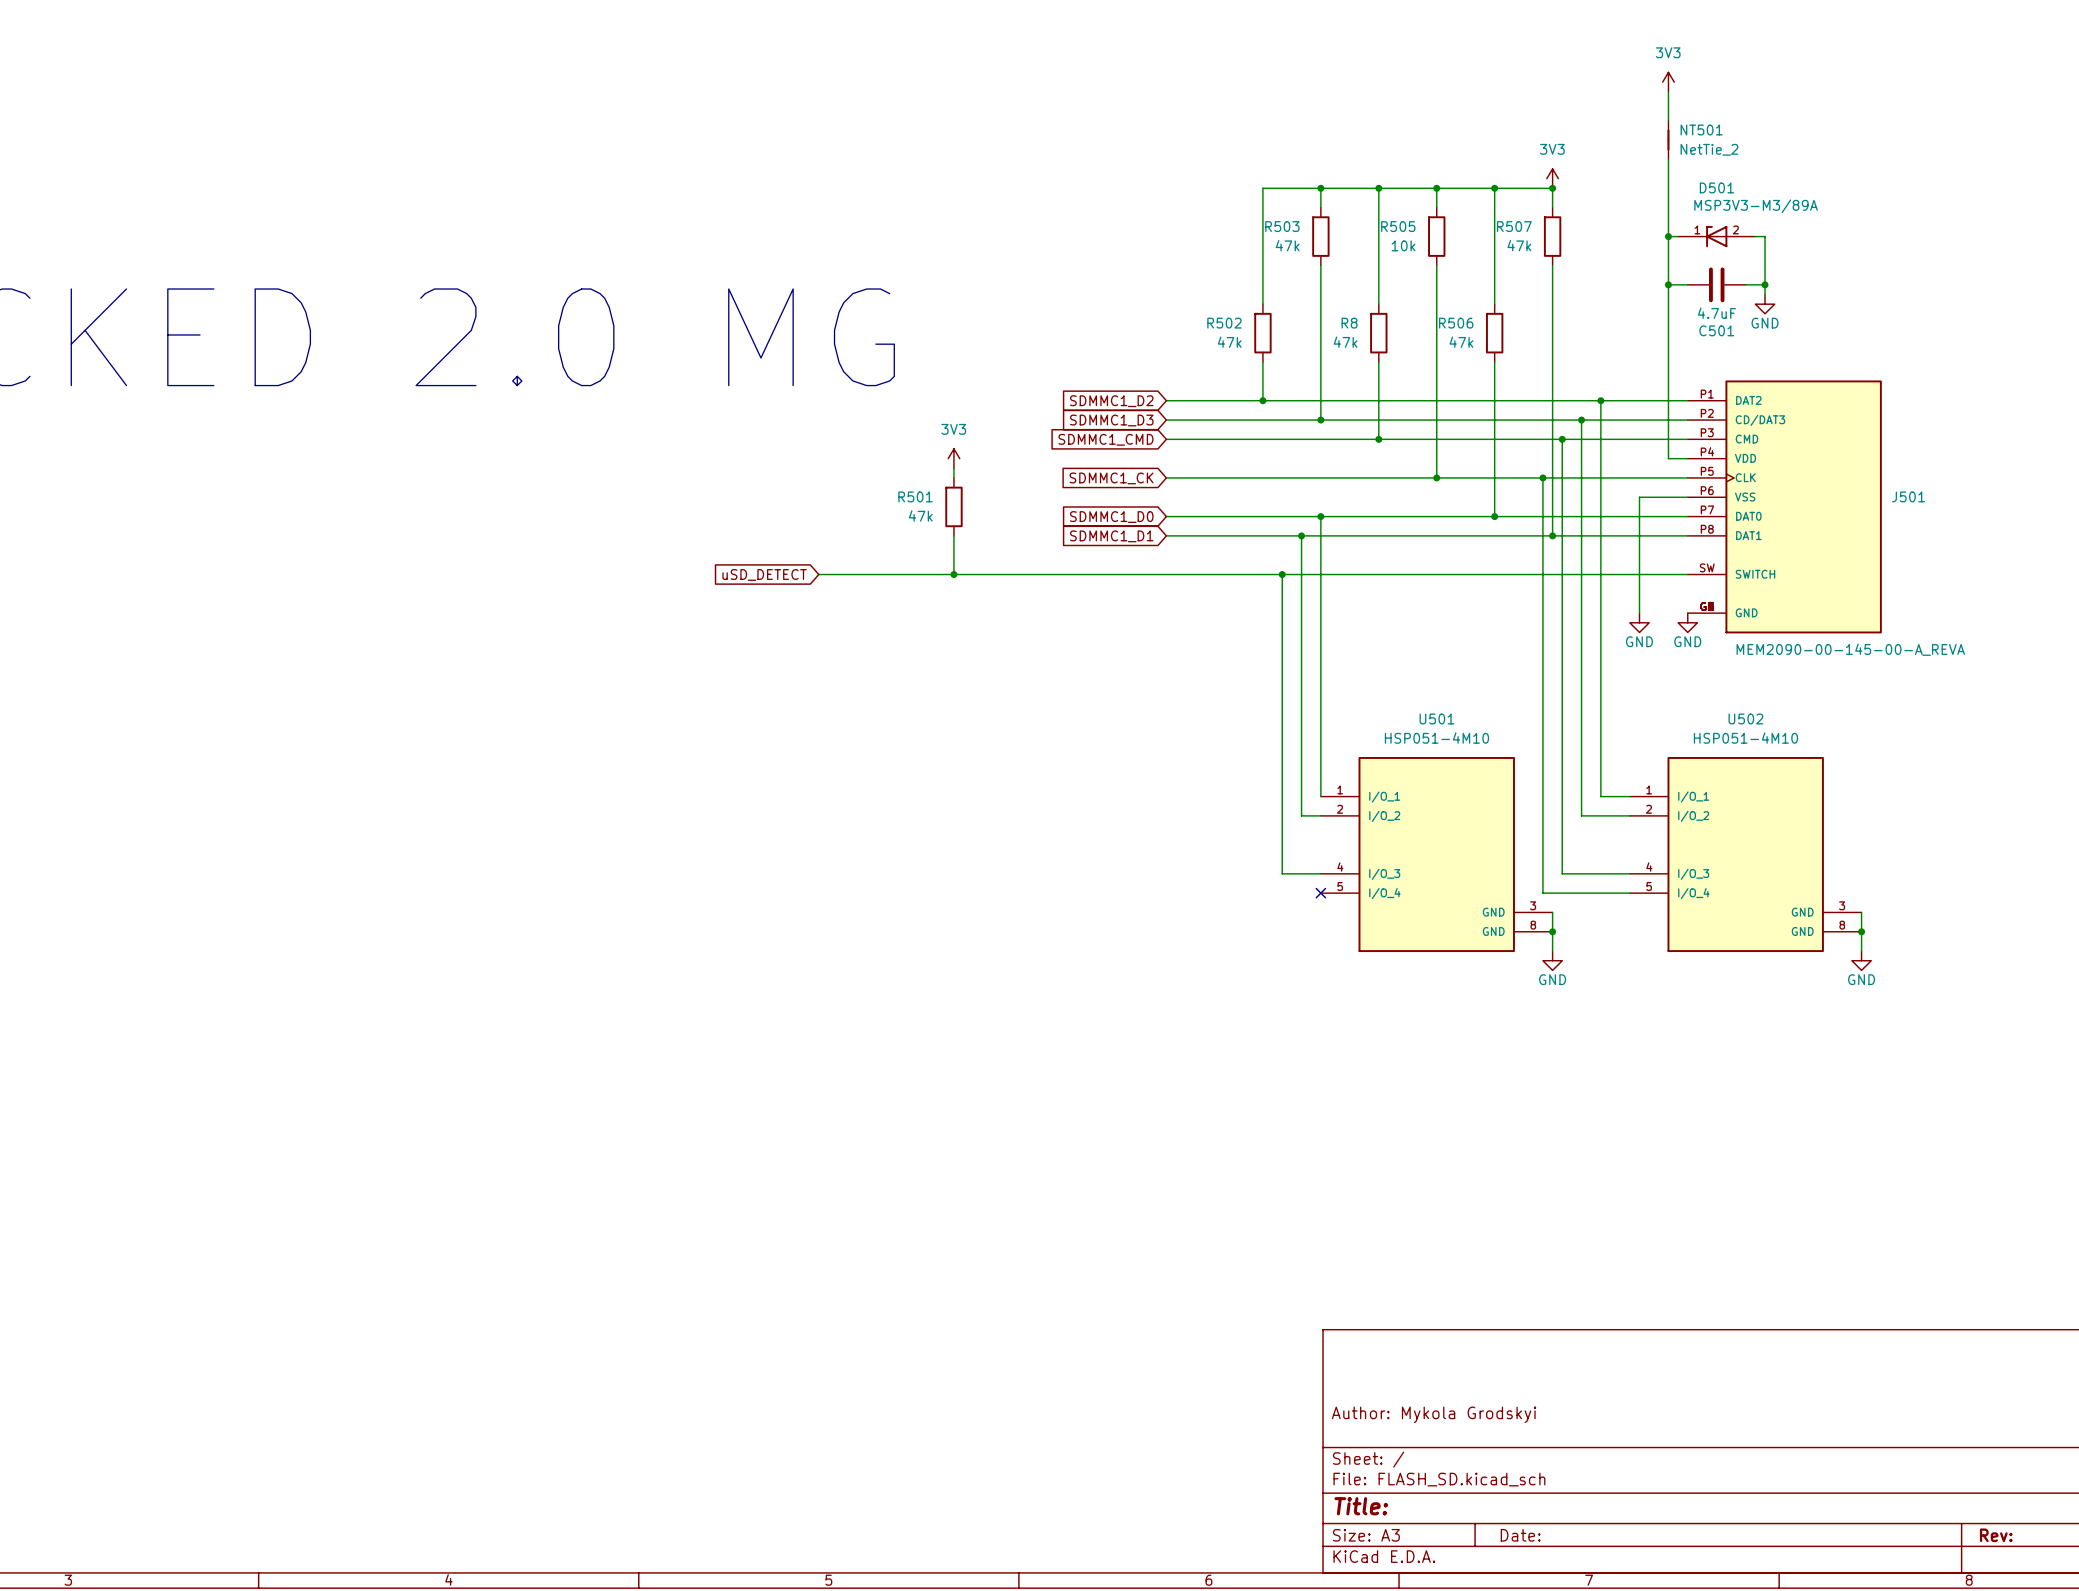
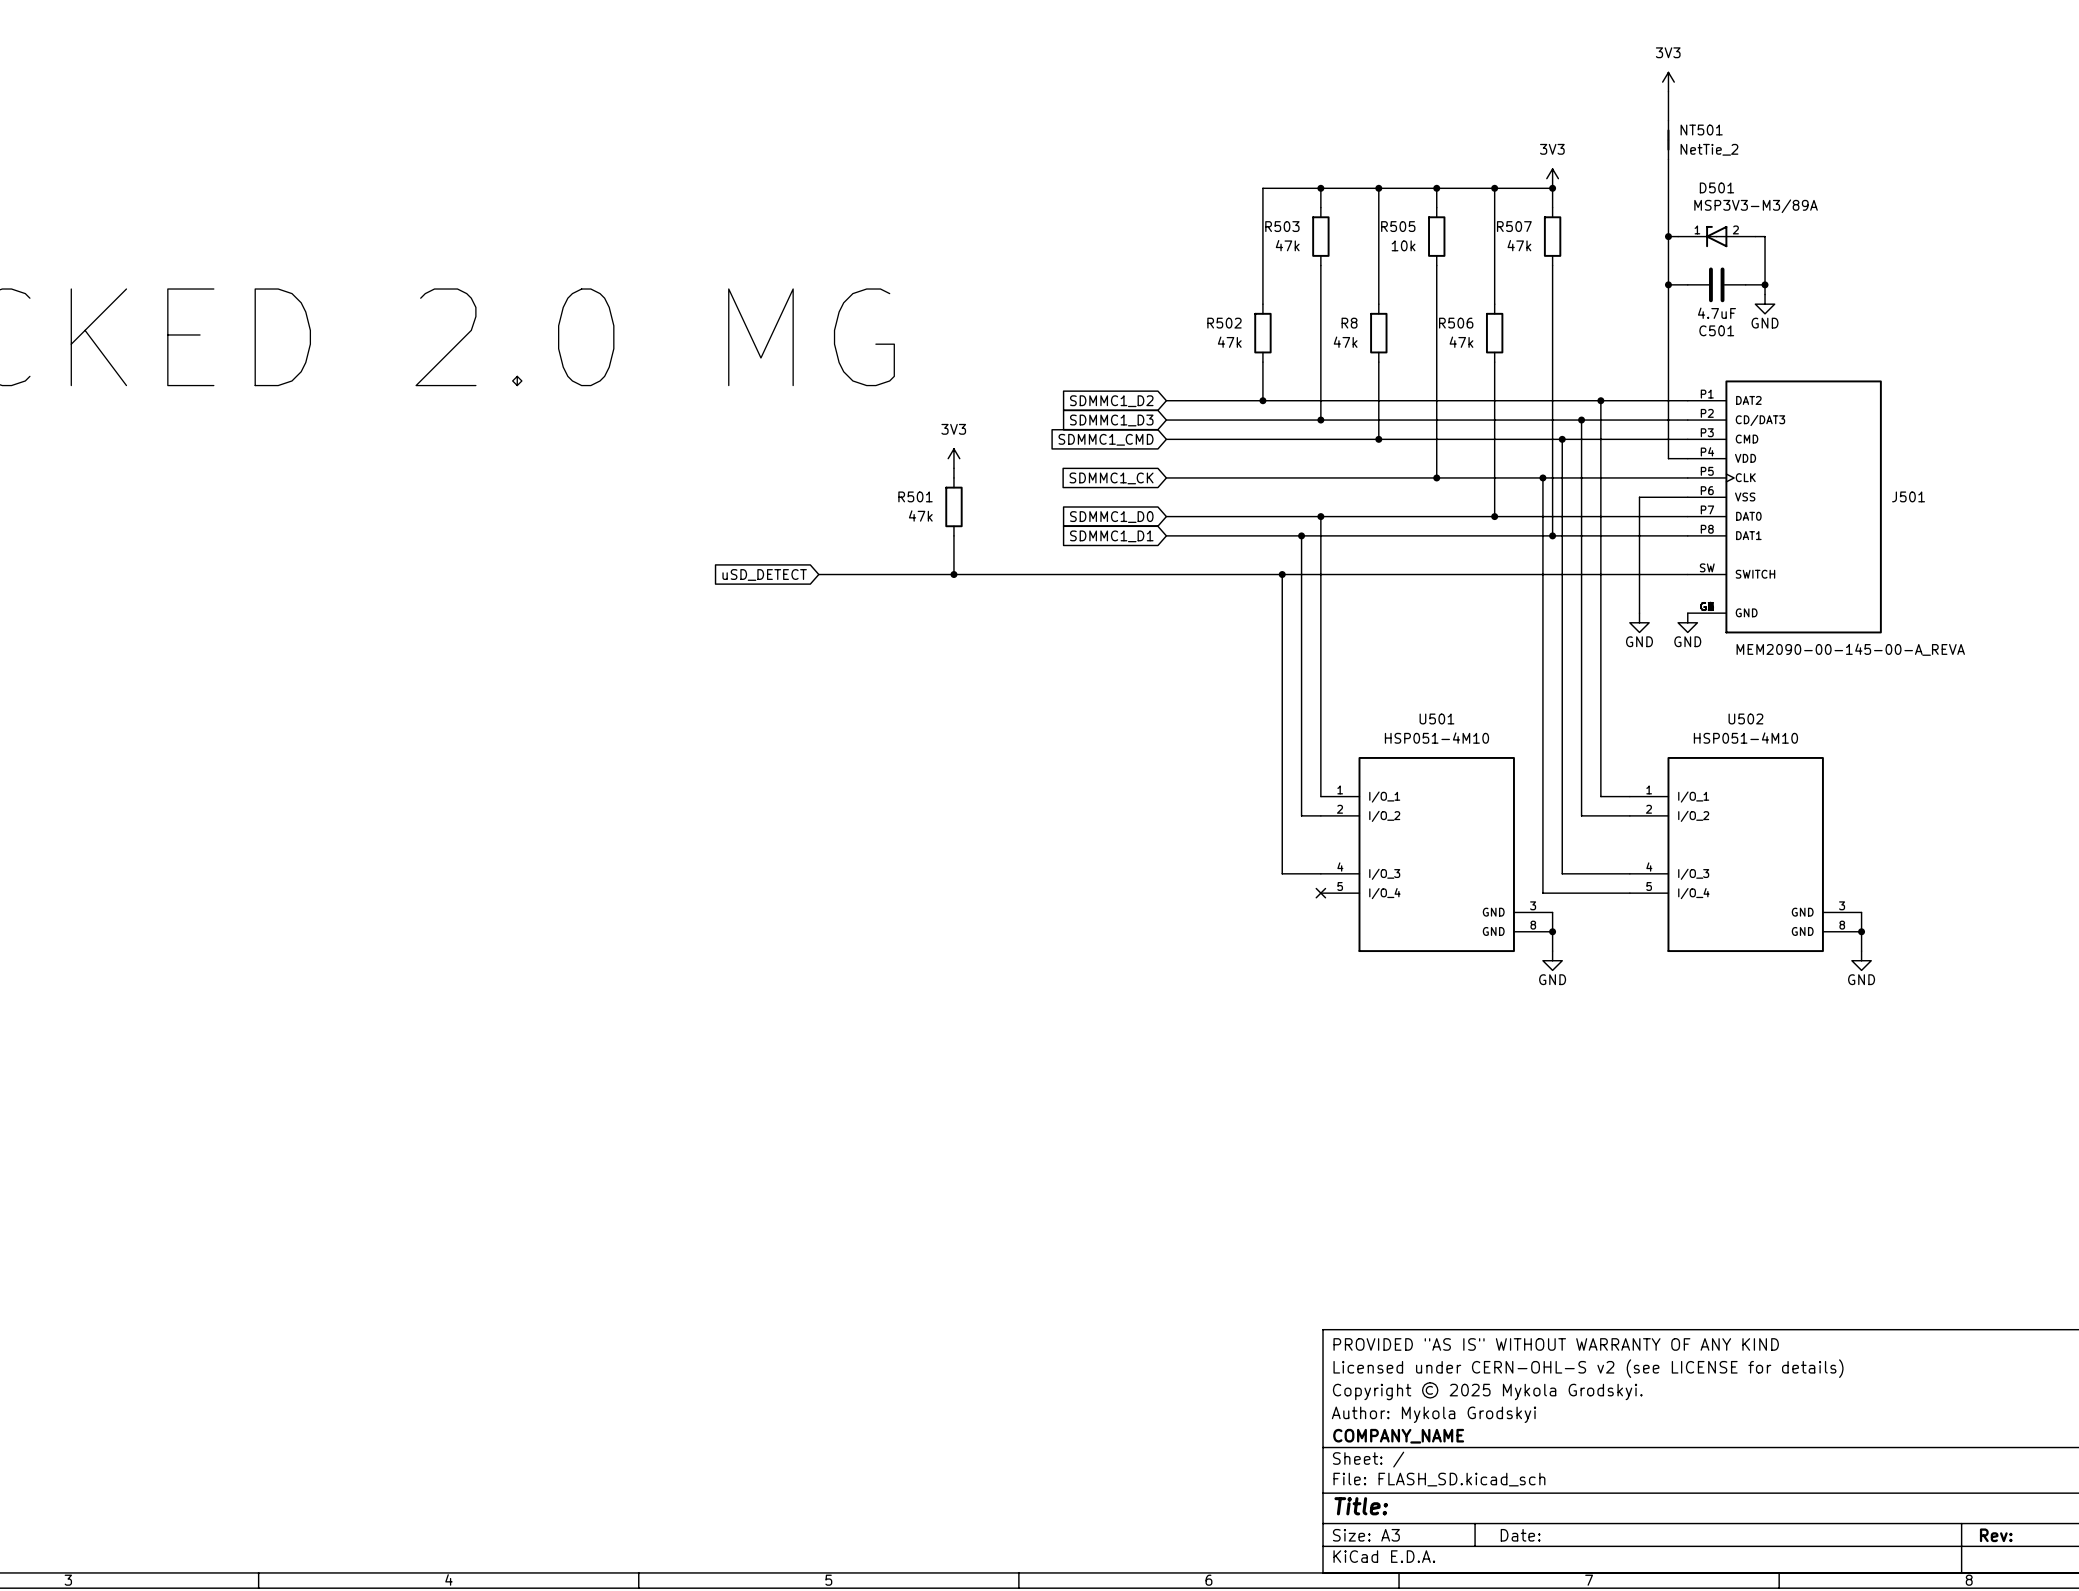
title block: none -> PROVIDED "AS IS" WITHOUT WARRANTY OF ANY KIND (1556, 1344)
title block: none -> Licensed under CERN-OHL-S v2 (see LICENSE for details) (1588, 1368)
title block: none -> Copyright © 2025 Mykola Grodskyi. (1487, 1391)
title block: none -> COMPANY_NAME (1398, 1436)

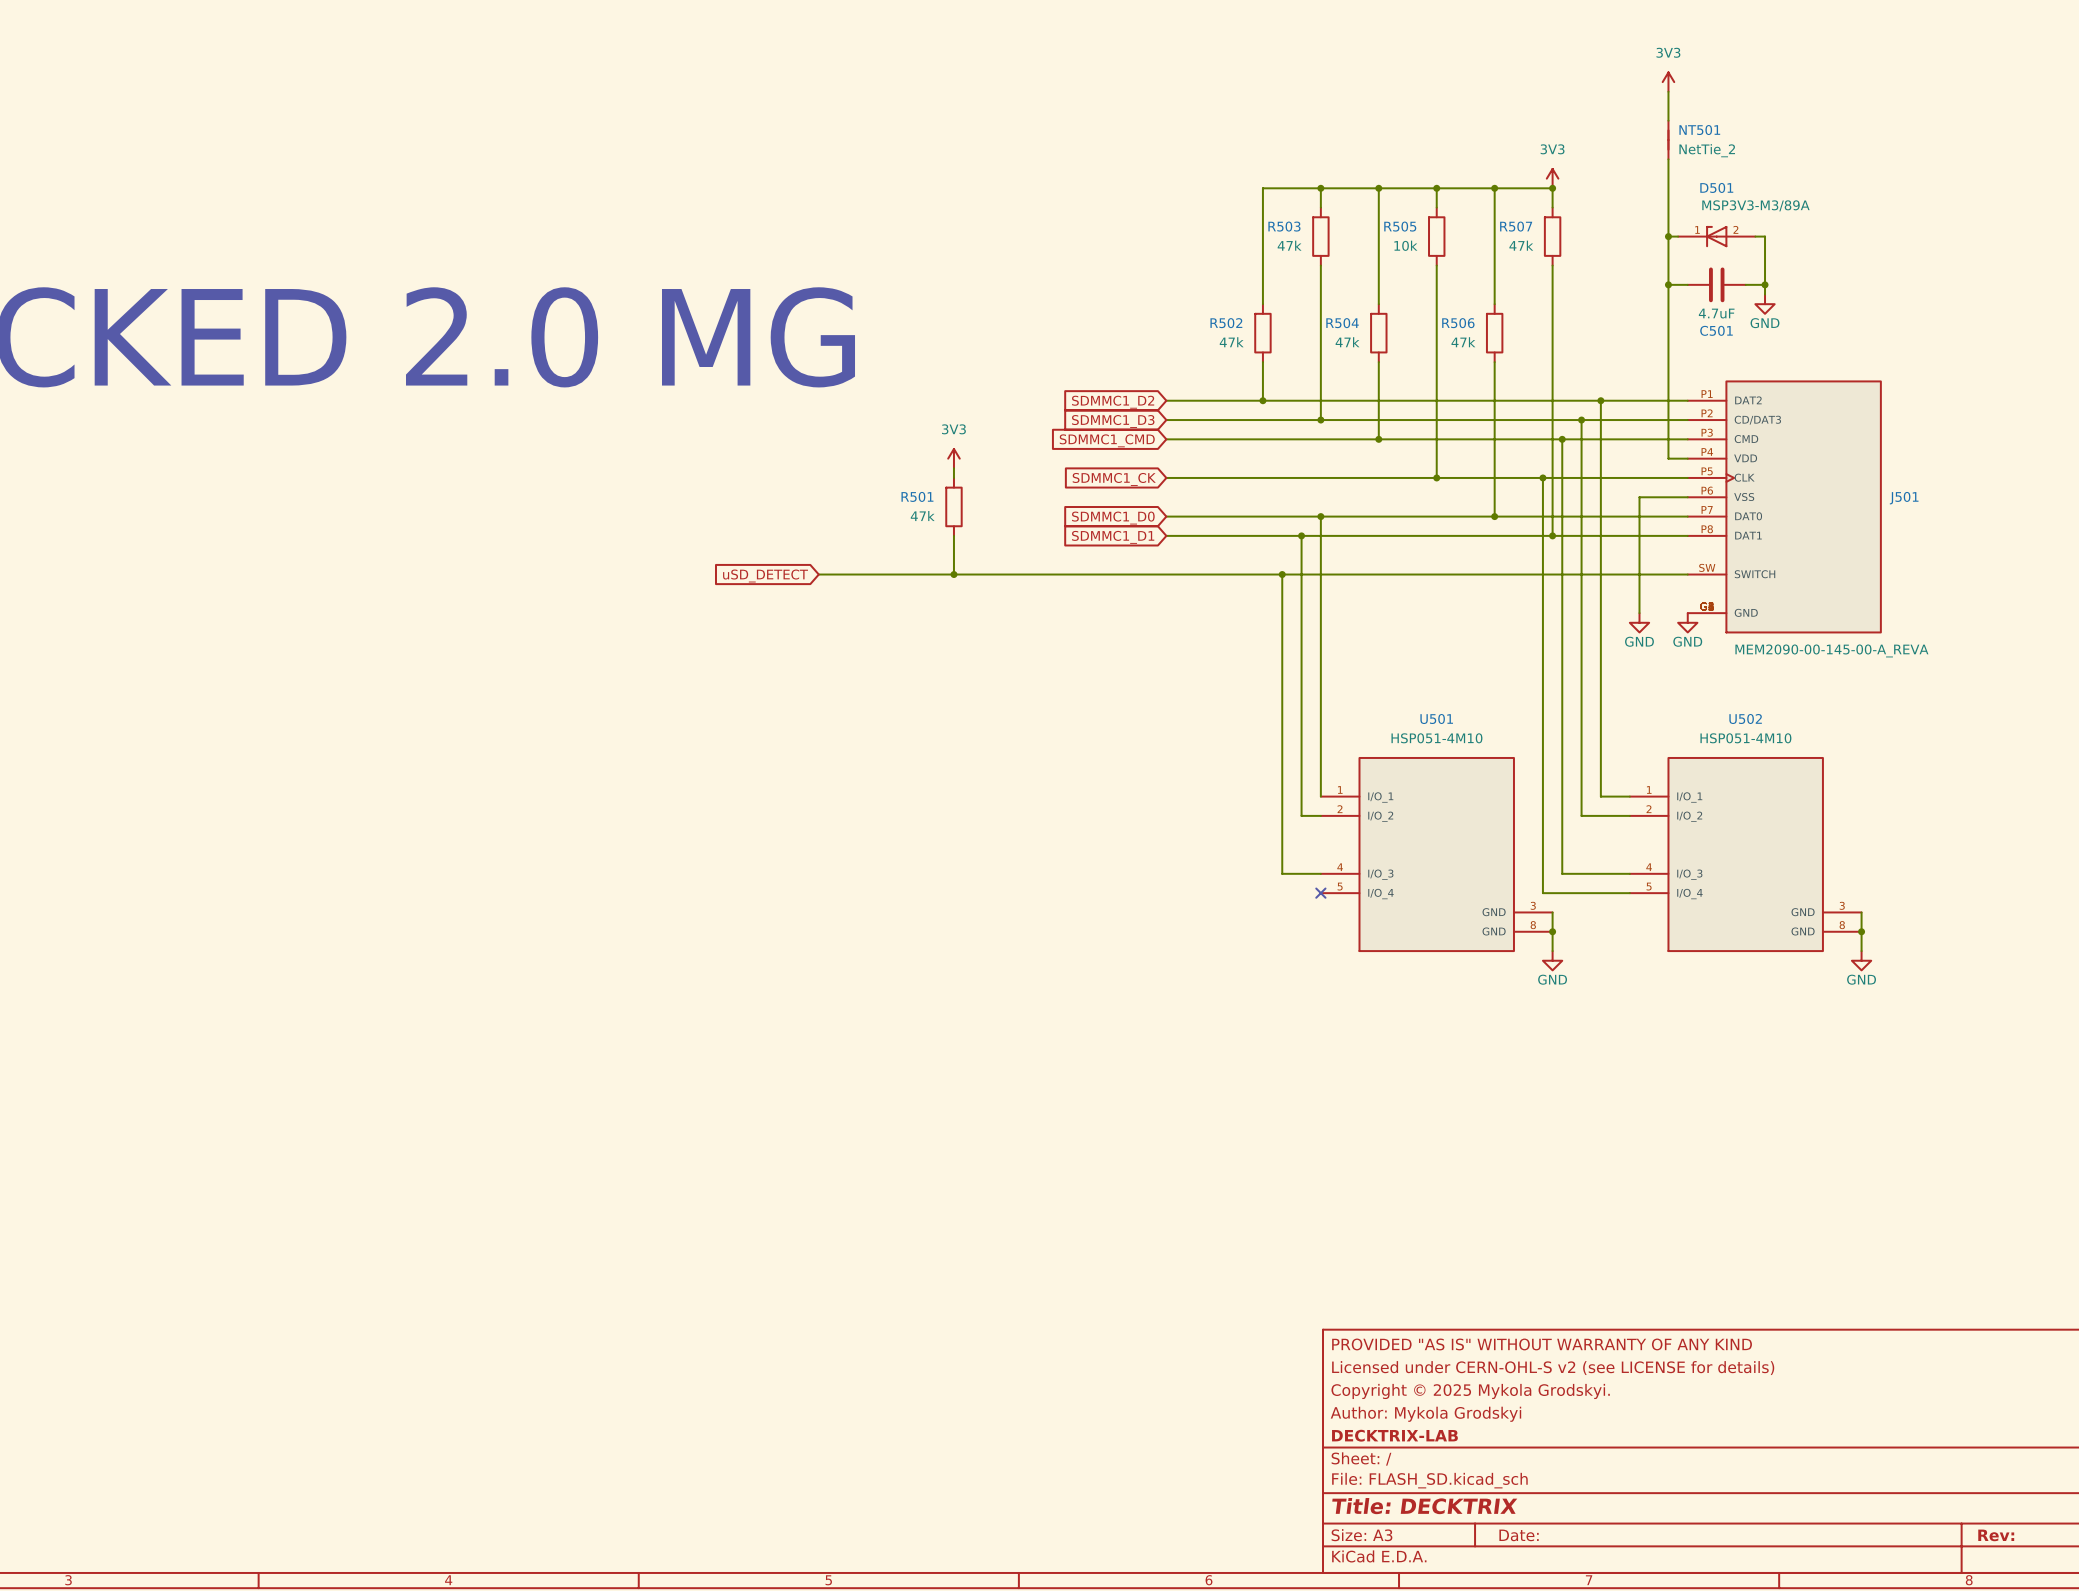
R8 name: R8 (1349, 323) -> R504 (1342, 323)
title block: COMPANY_NAME (1398, 1436) -> DECKTRIX-LAB (1394, 1435)
title block: Title: (1361, 1506) -> Title: DECKTRIX (1424, 1506)

